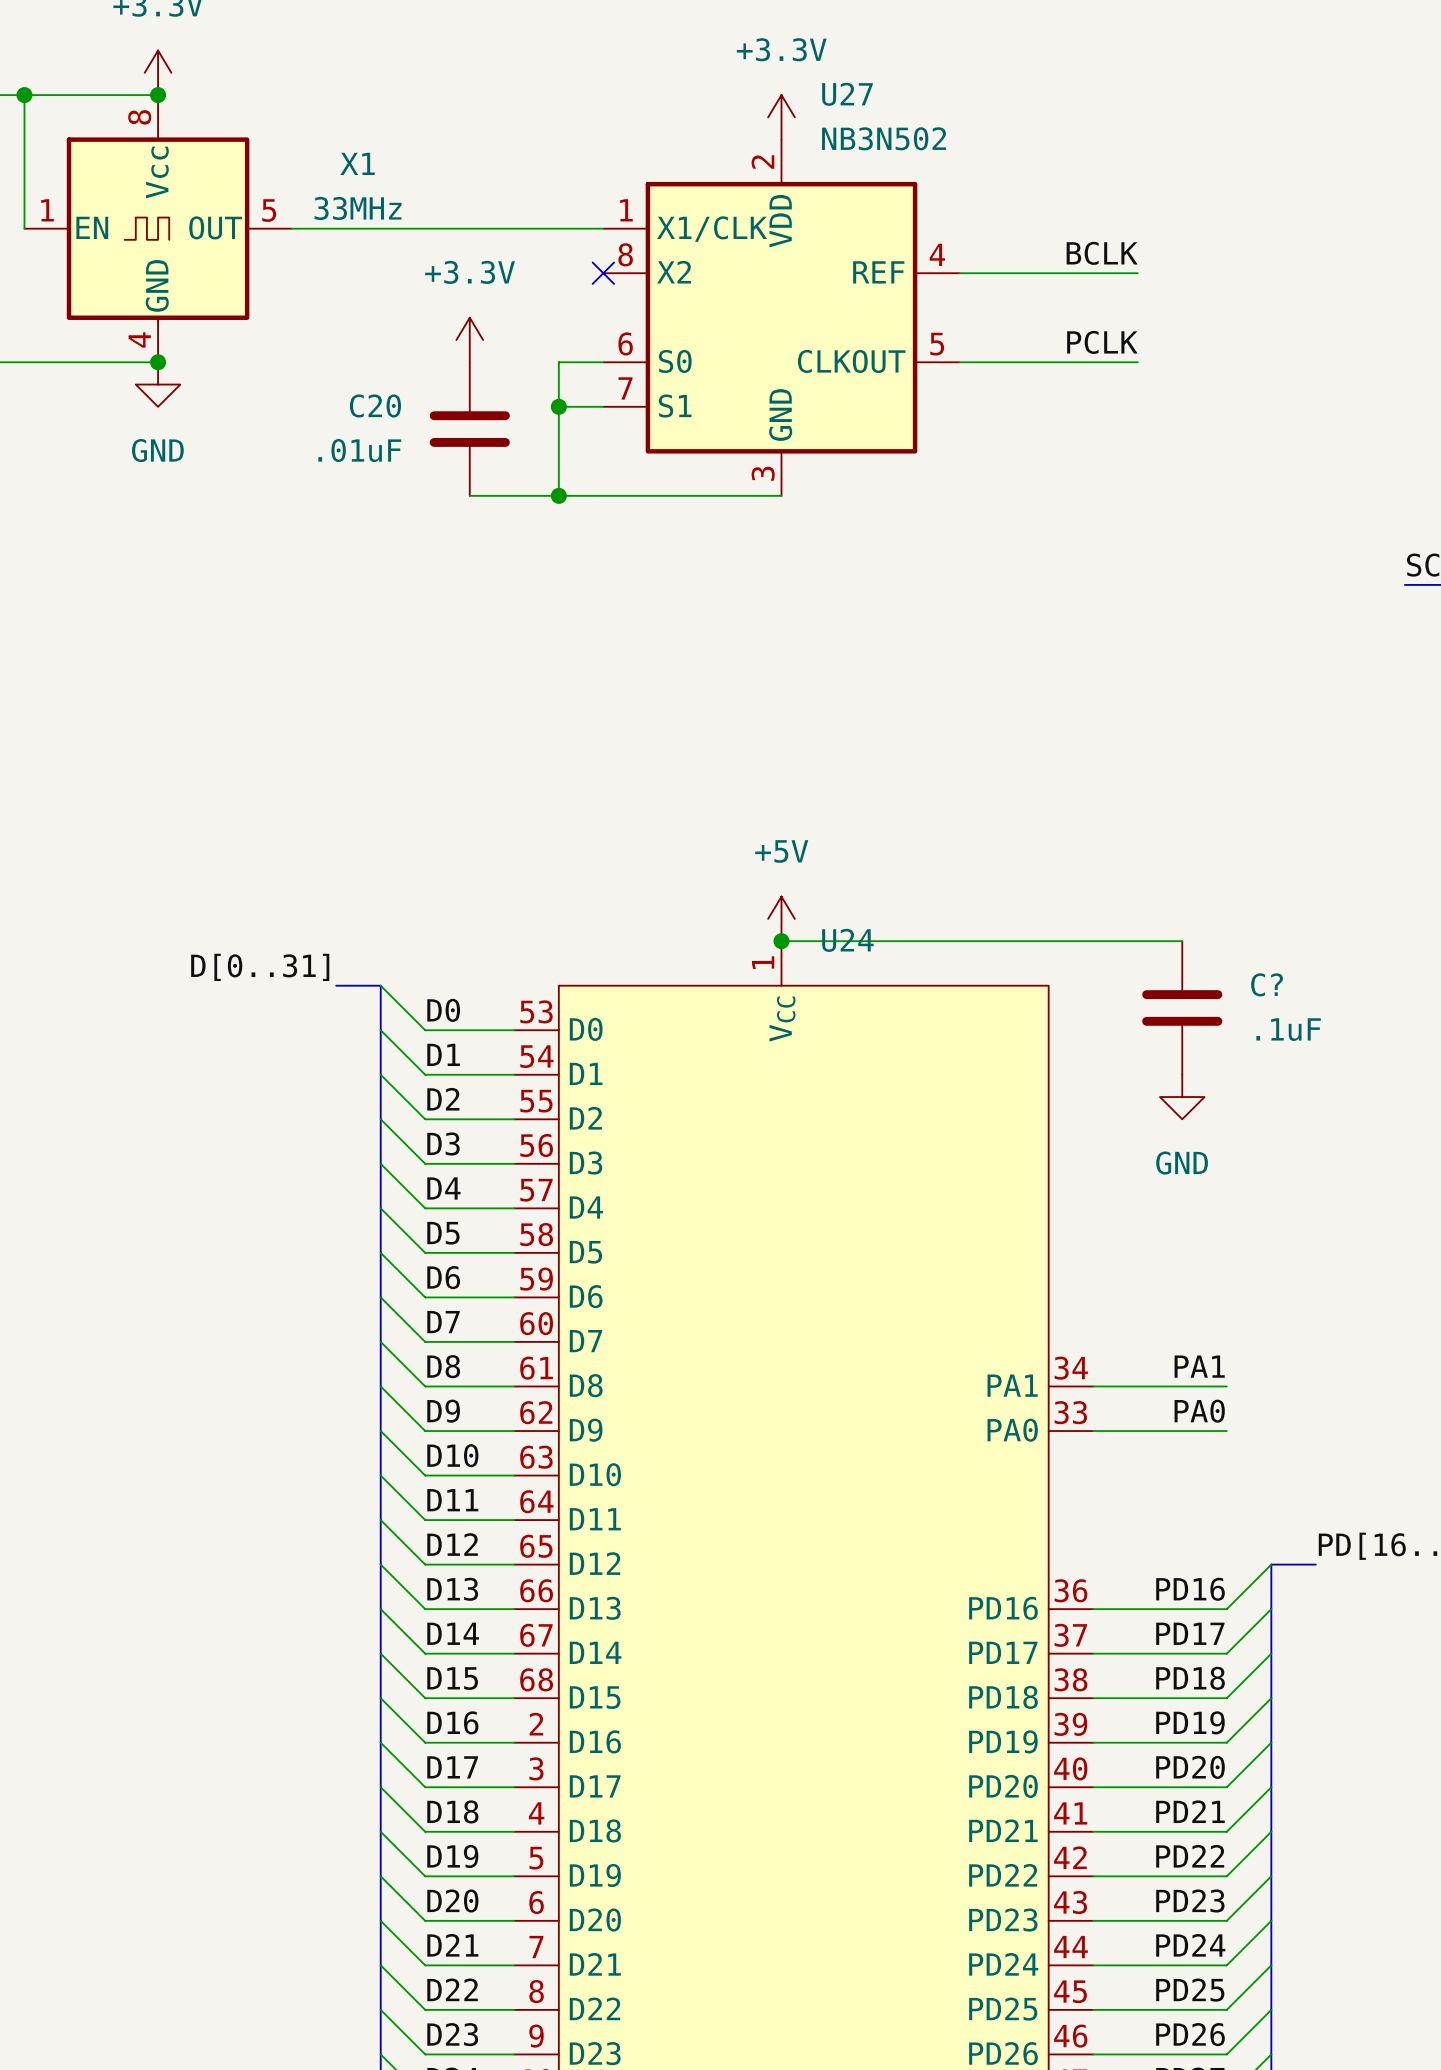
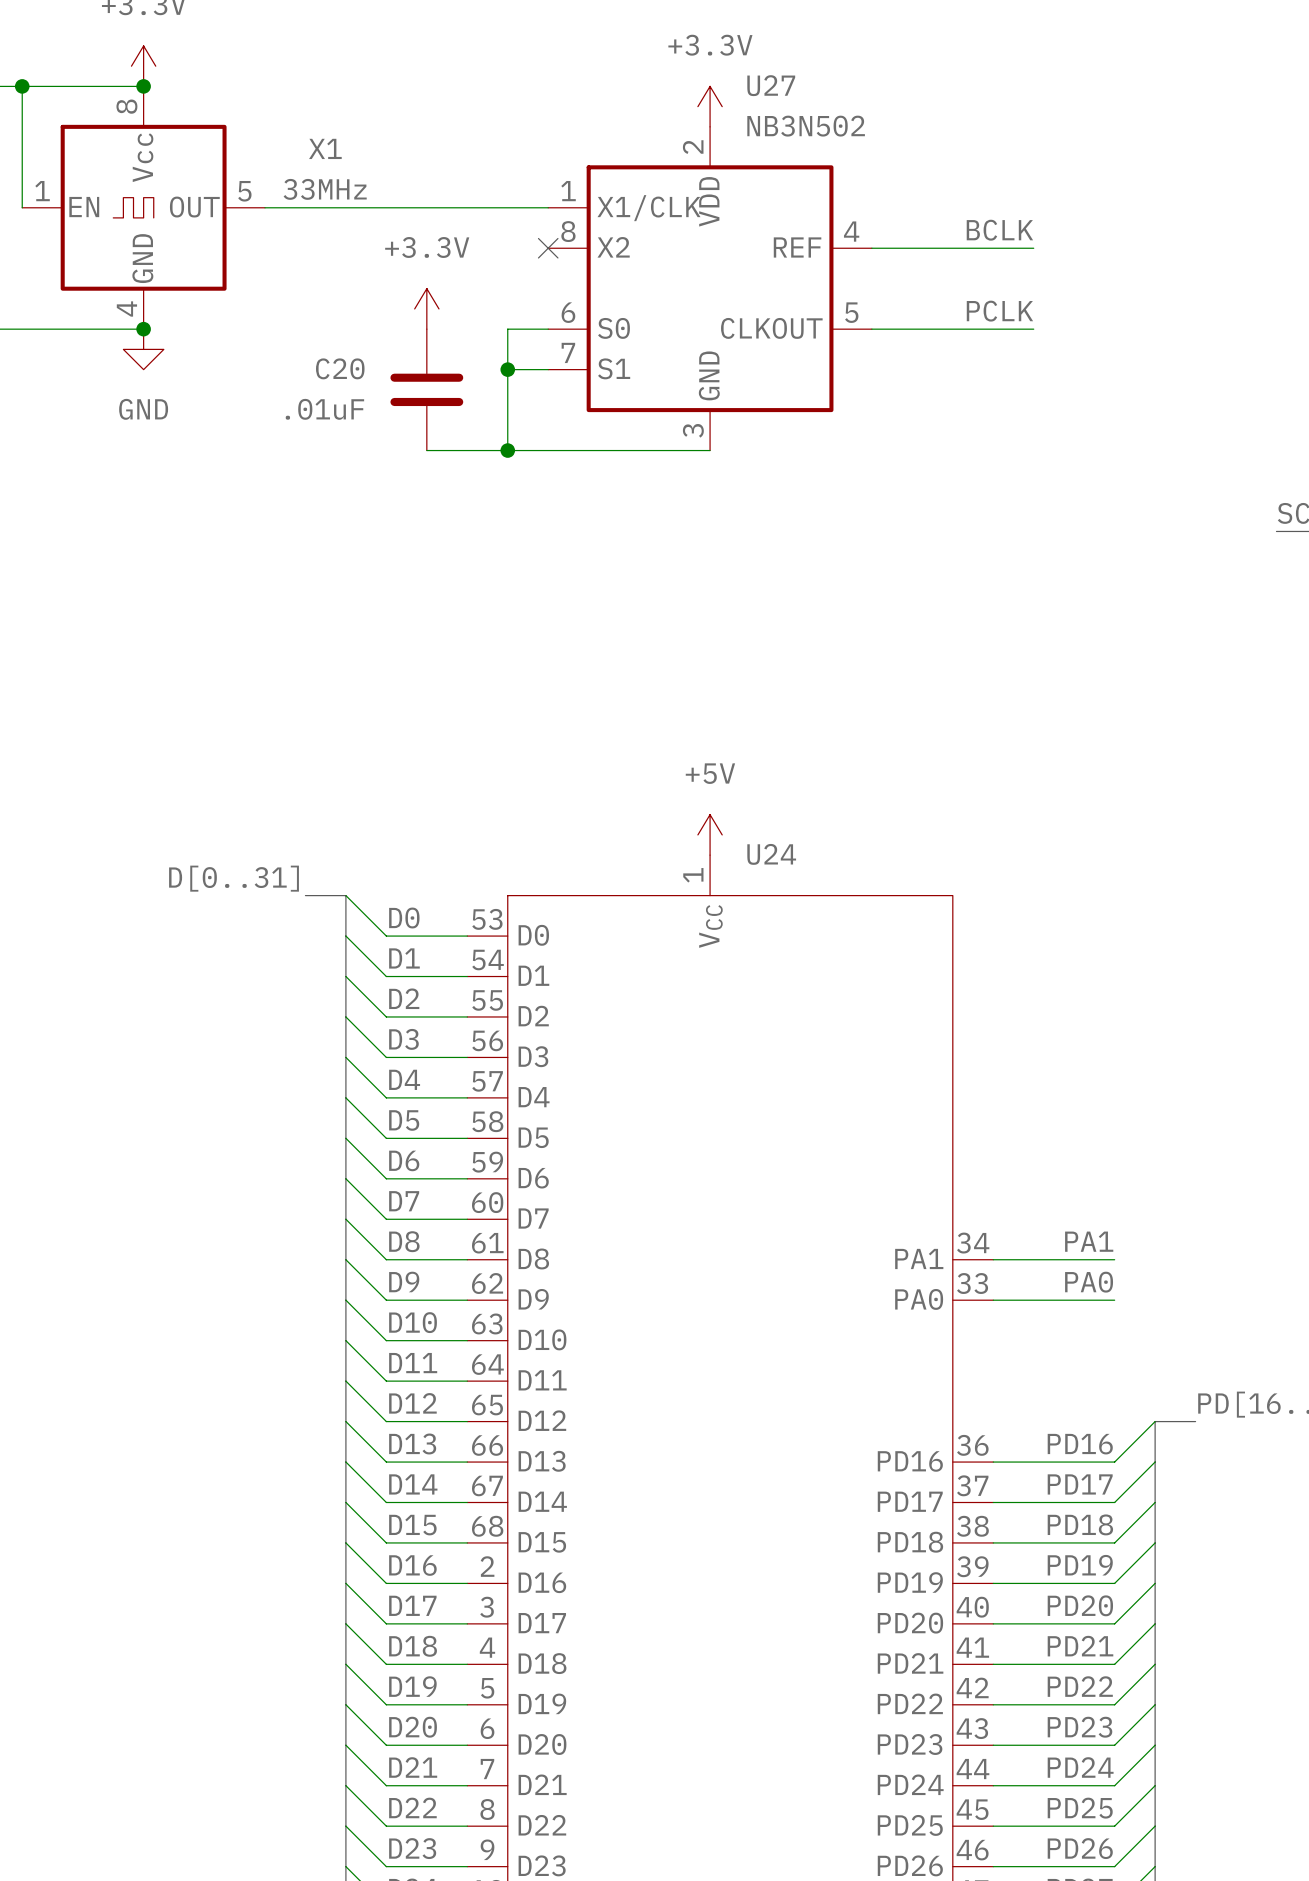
wire: (781, 941) (1182, 941) -> none
junction: (781, 941) -> none
C?: .1uF (1182, 1007) -> none
power symbol: GND (1182, 1097) -> none

